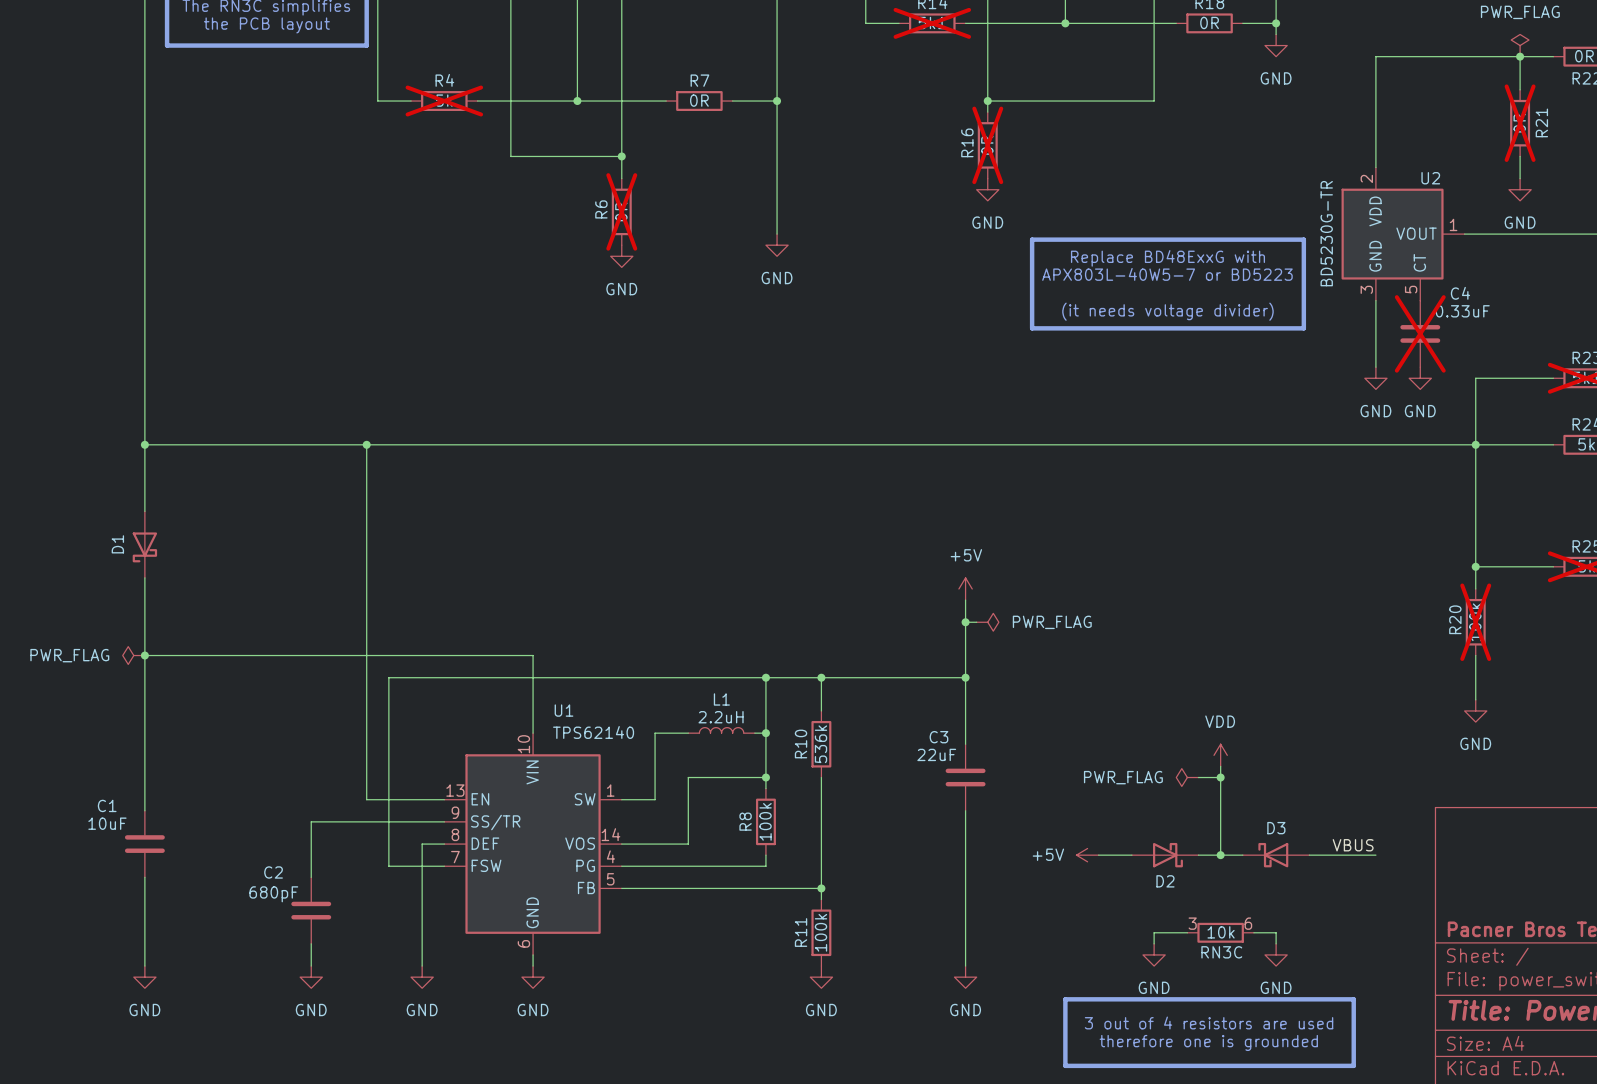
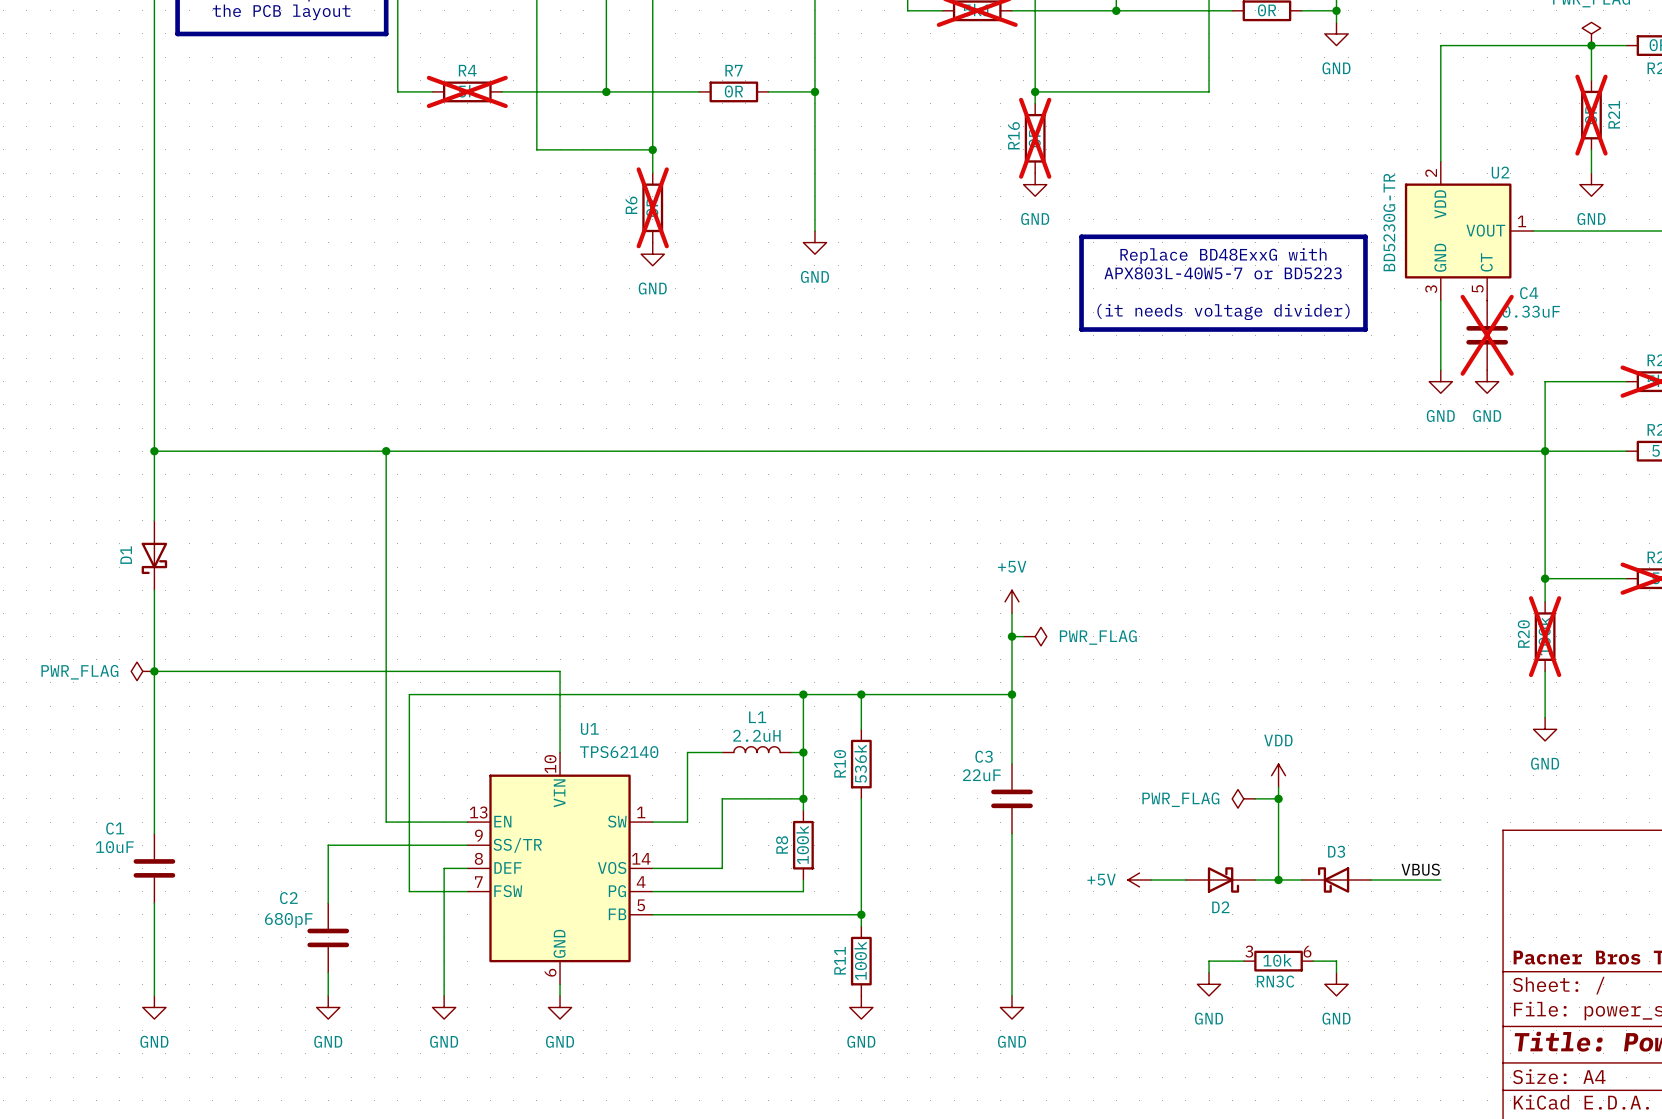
line: (1065, 999) (1353, 999) (1353, 1065) (1065, 1065) (1065, 999) -> none
text: 3 out of 4 resistors are used (1209, 1022) -> none
text: therefore one is grounded (1208, 1042) -> none

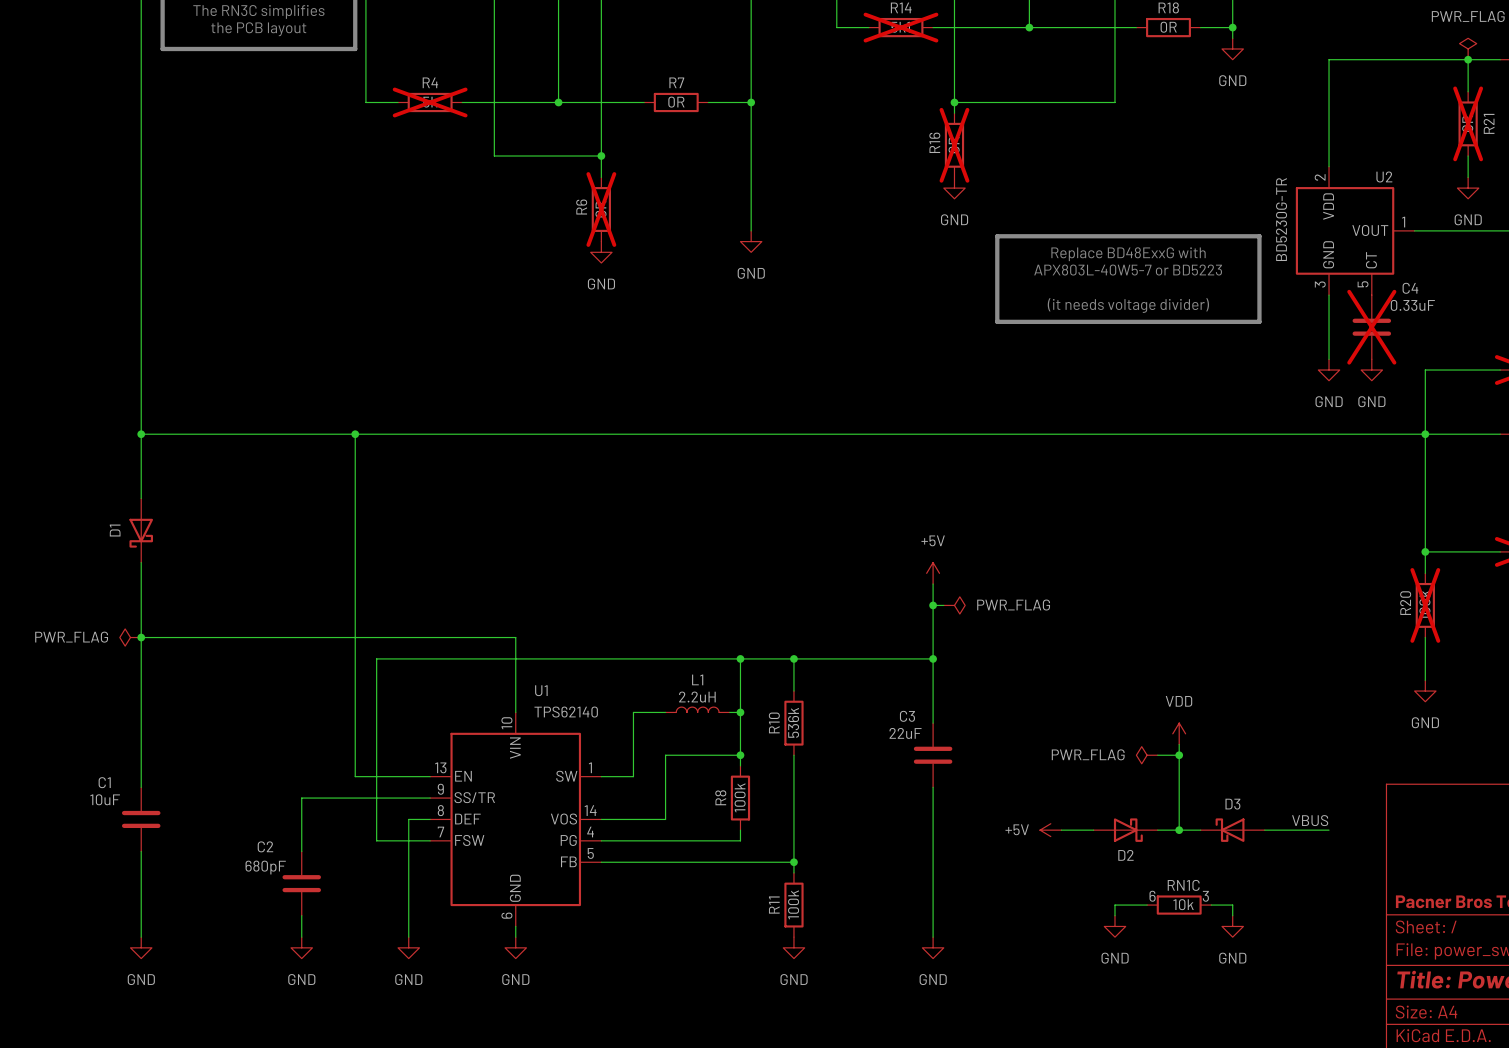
RN3C rotation: 0° (1278, 961) -> 180° (1179, 905)
RN3C name: RN3C (1275, 981) -> RN1C (1183, 885)

